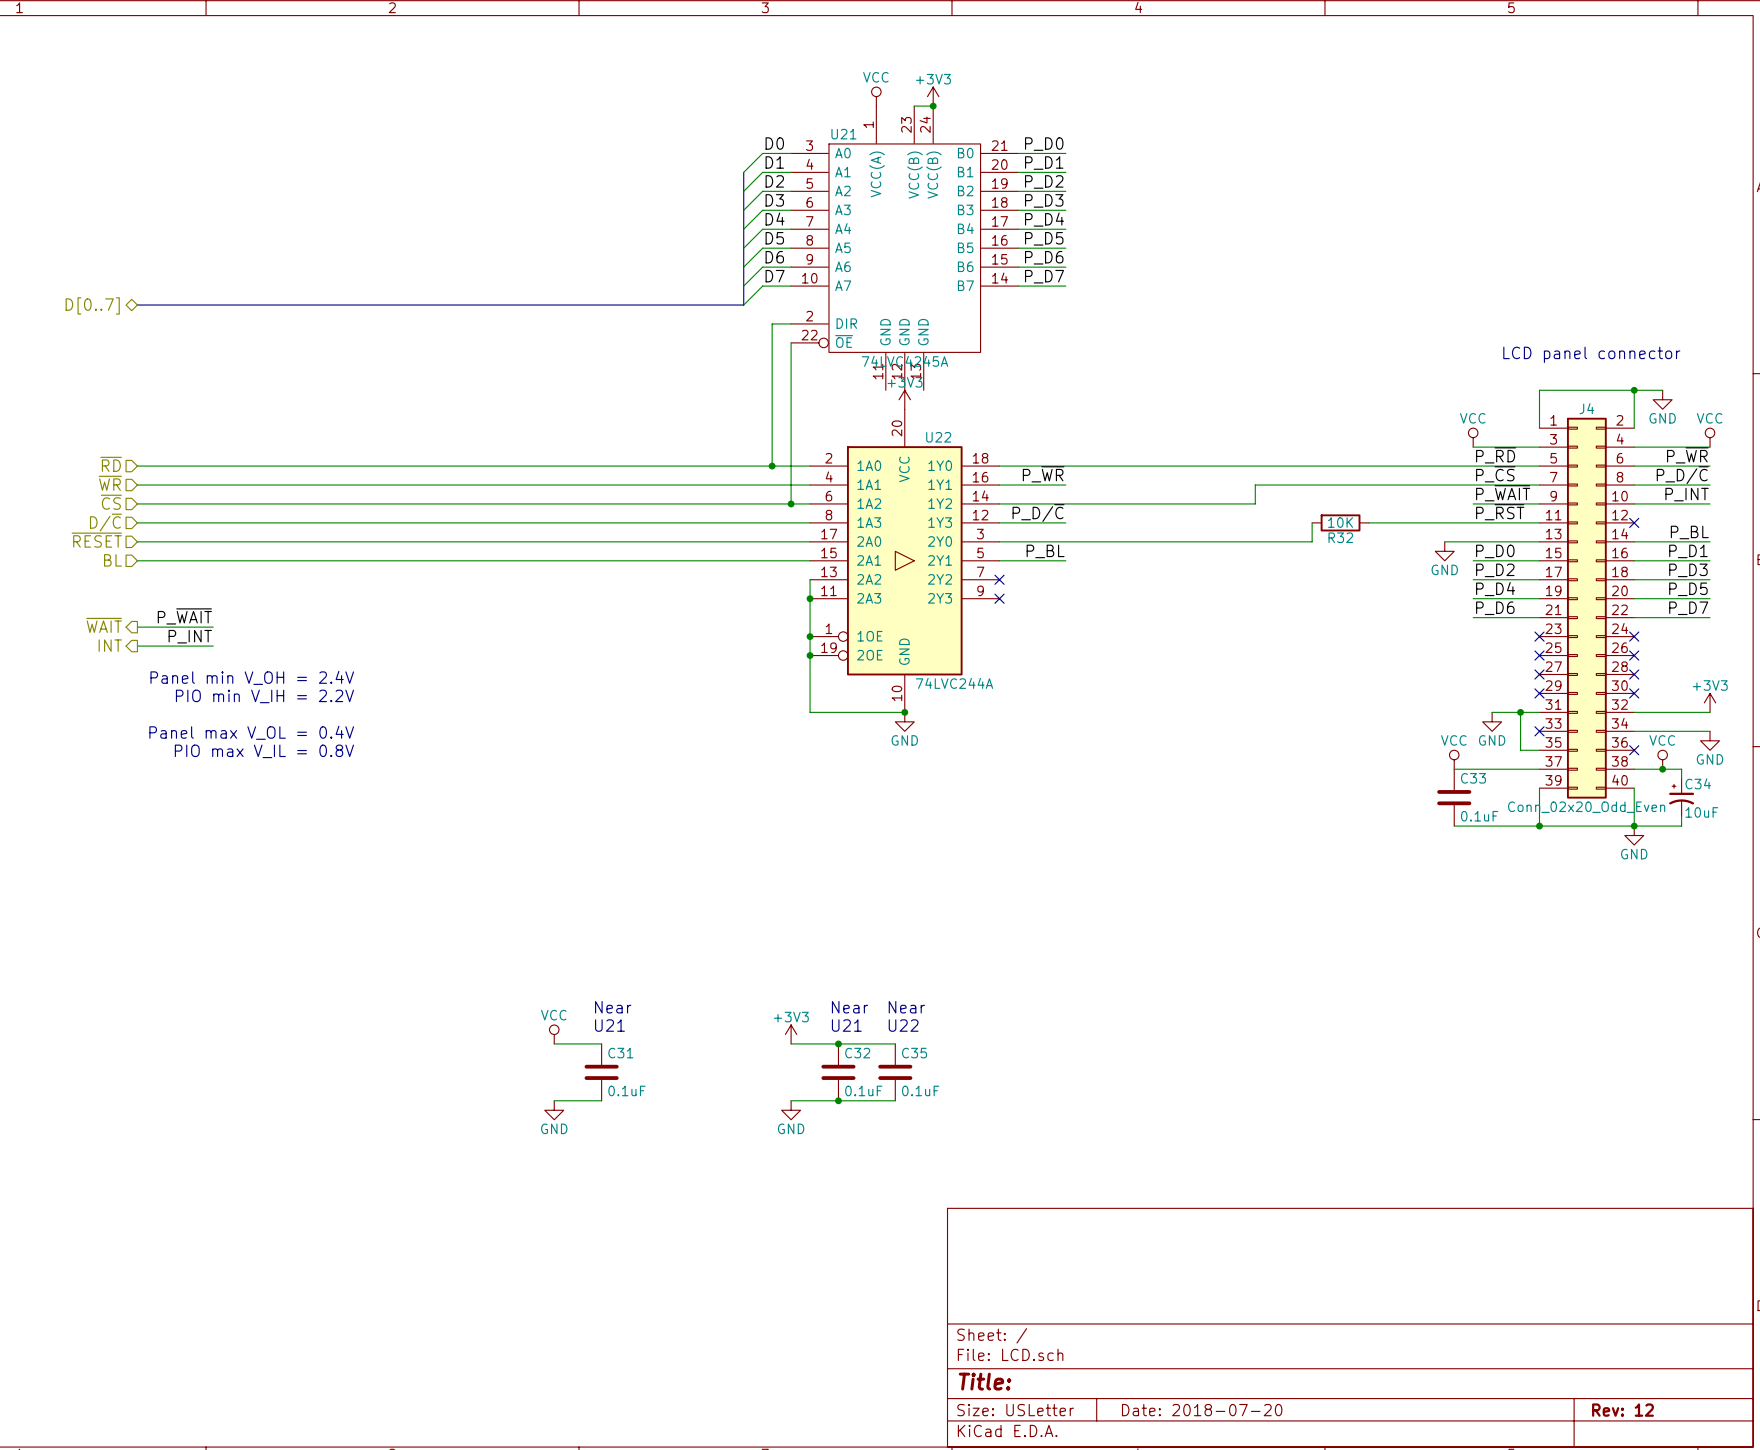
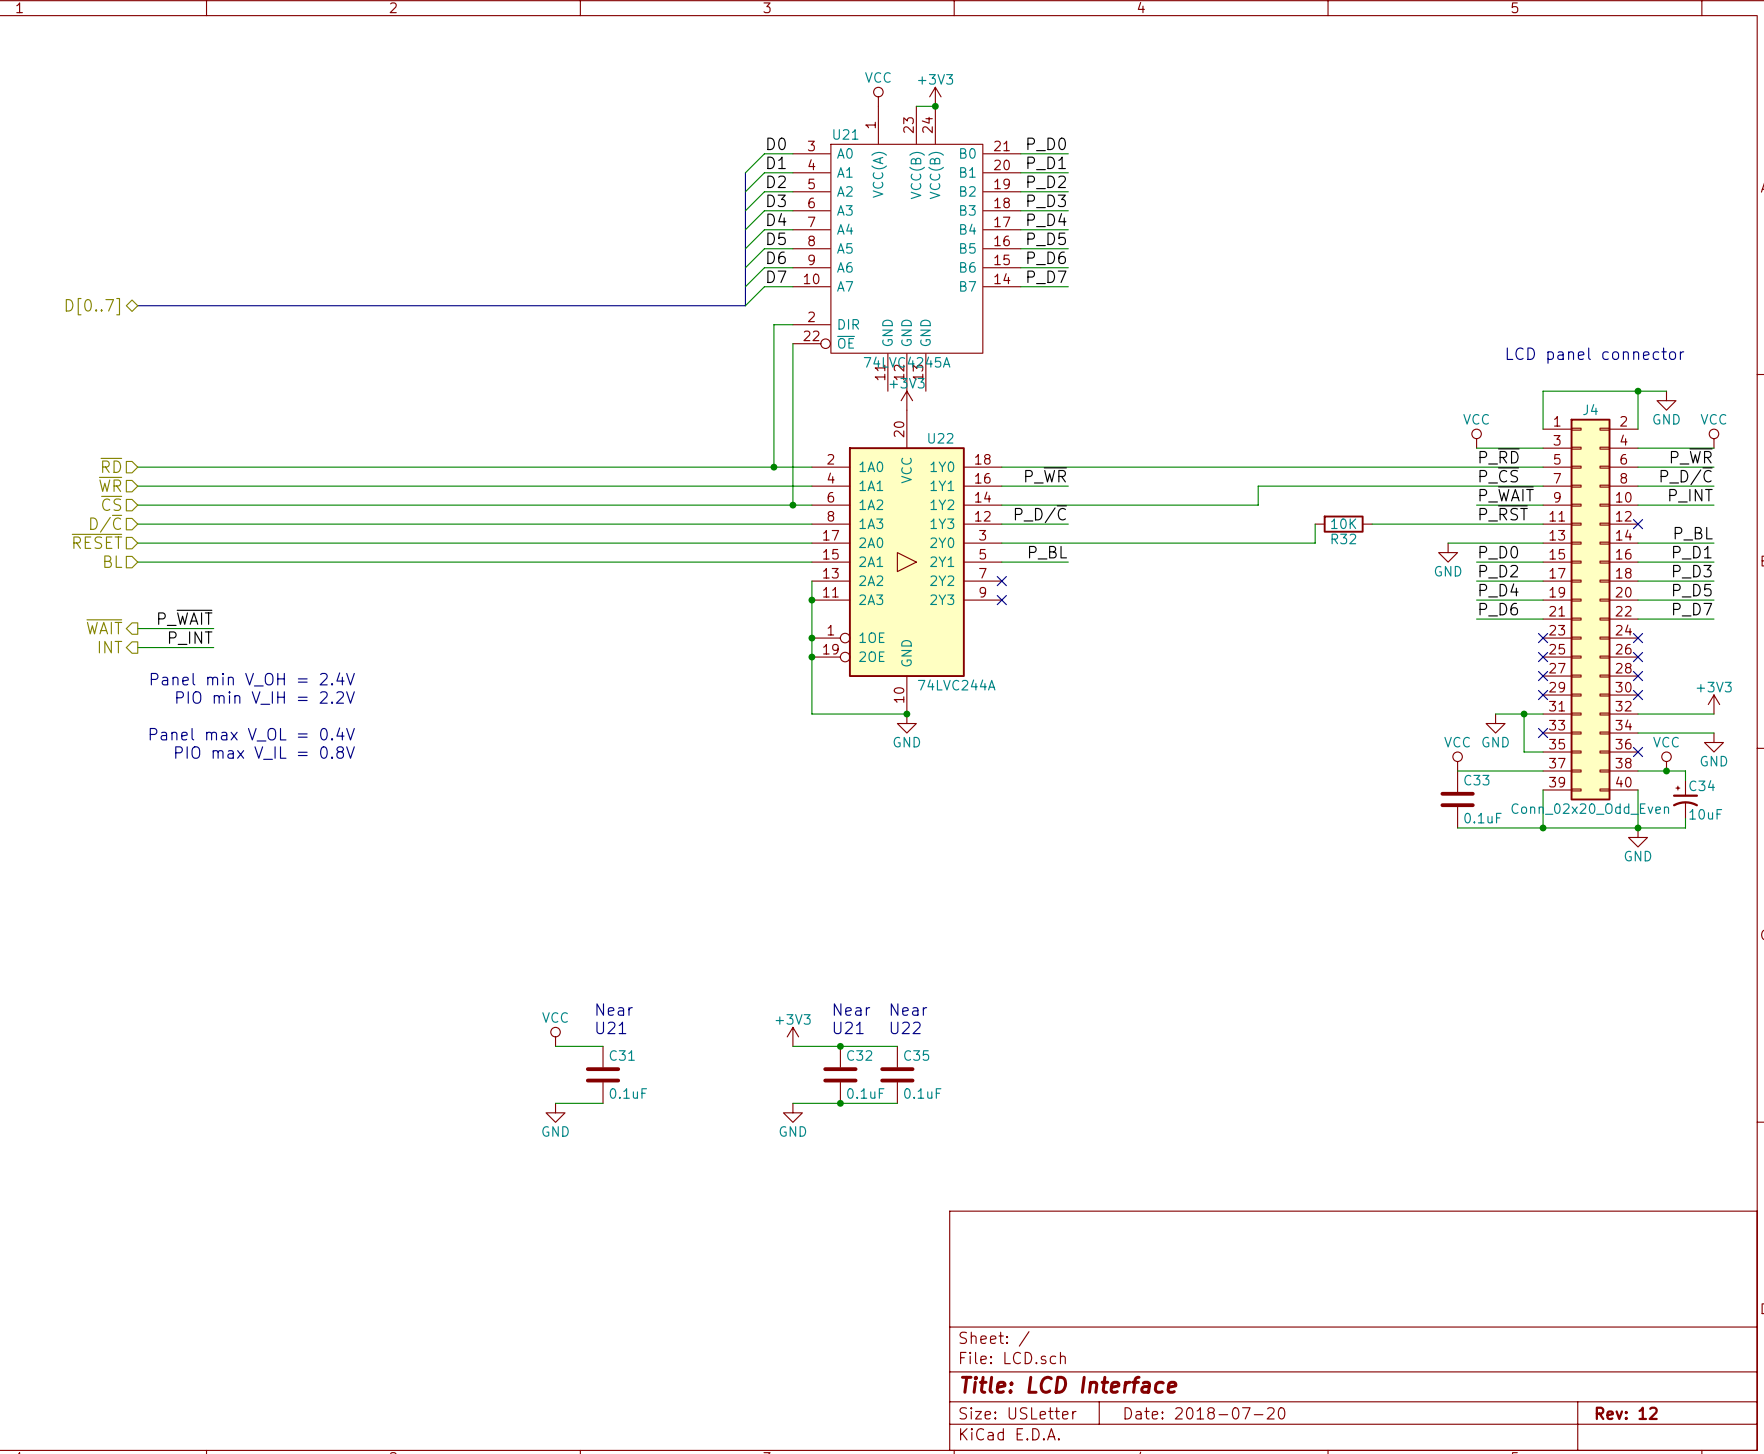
title block: Title: (985, 1381) -> Title: LCD Interface (1069, 1384)

